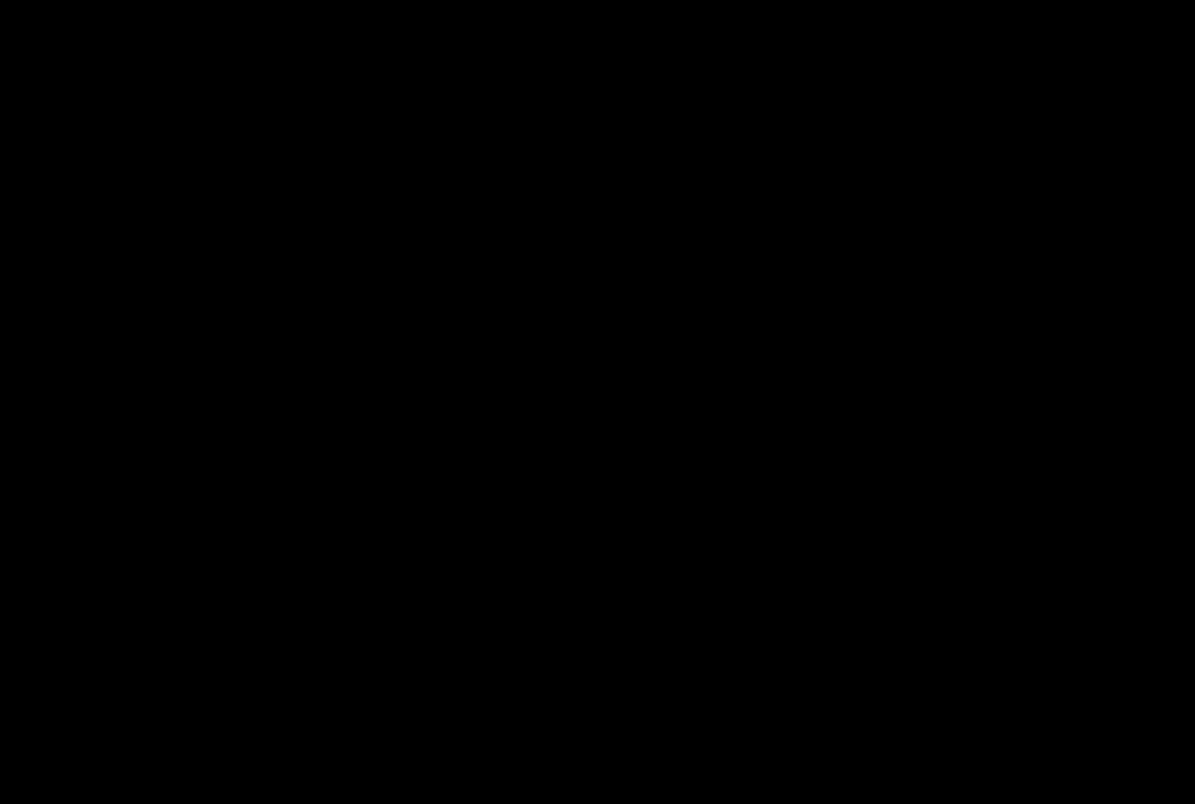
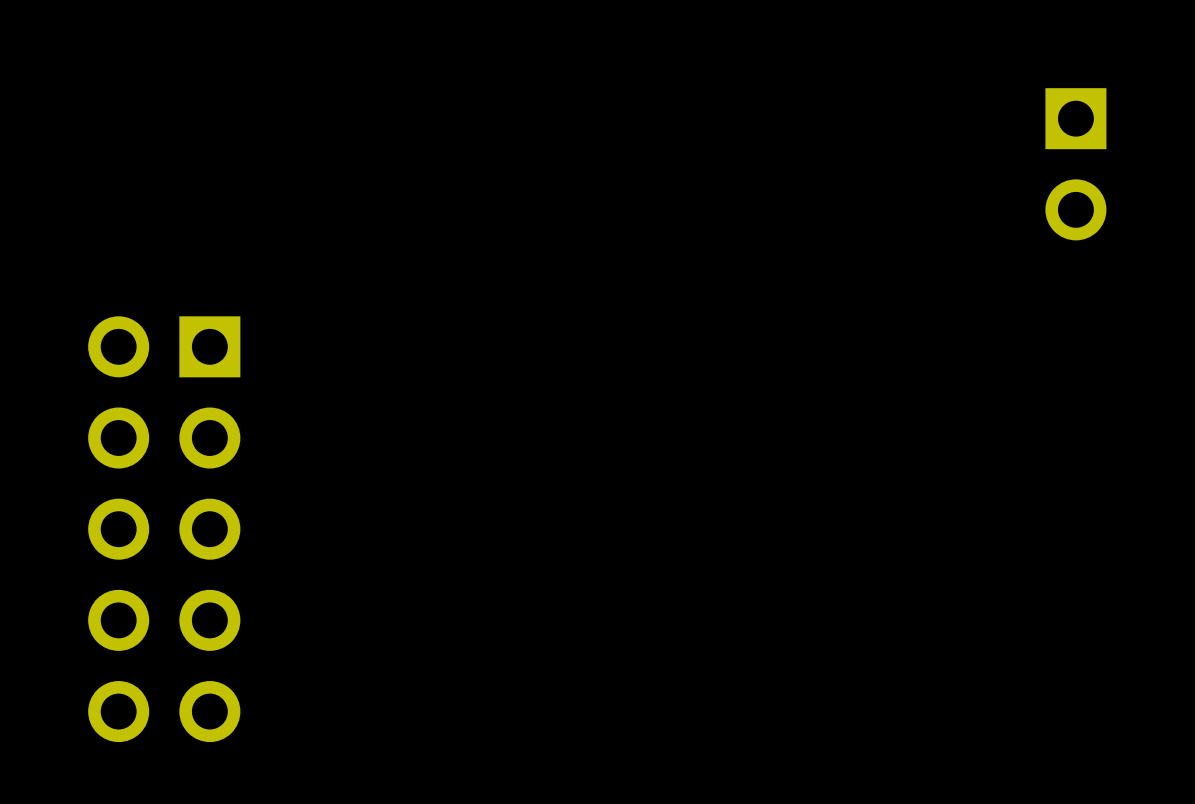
part: none -> (1075, 164)
part: none -> (164, 529)

